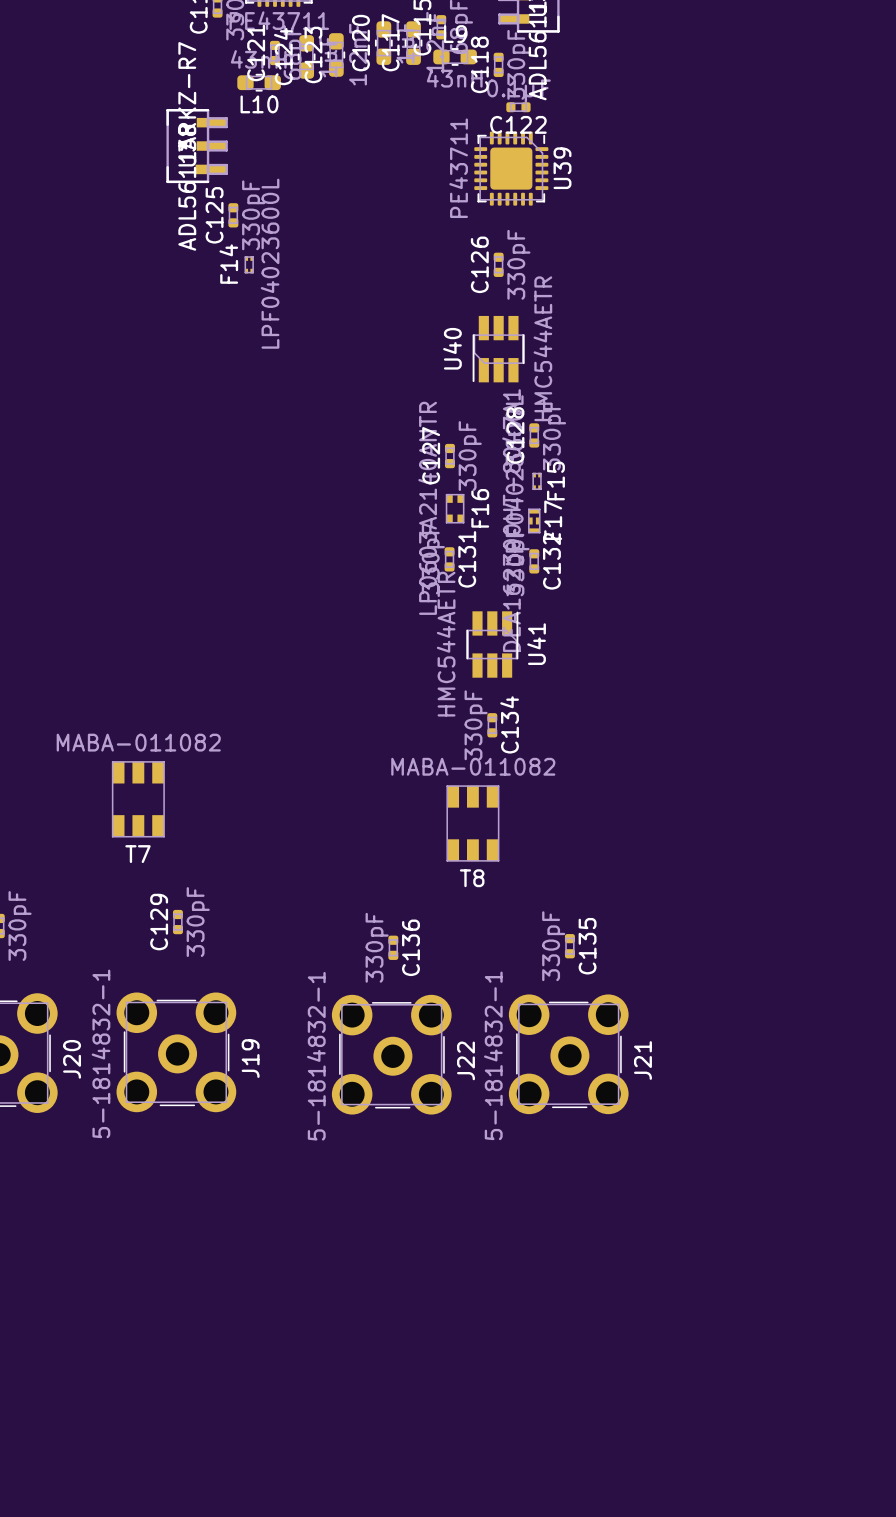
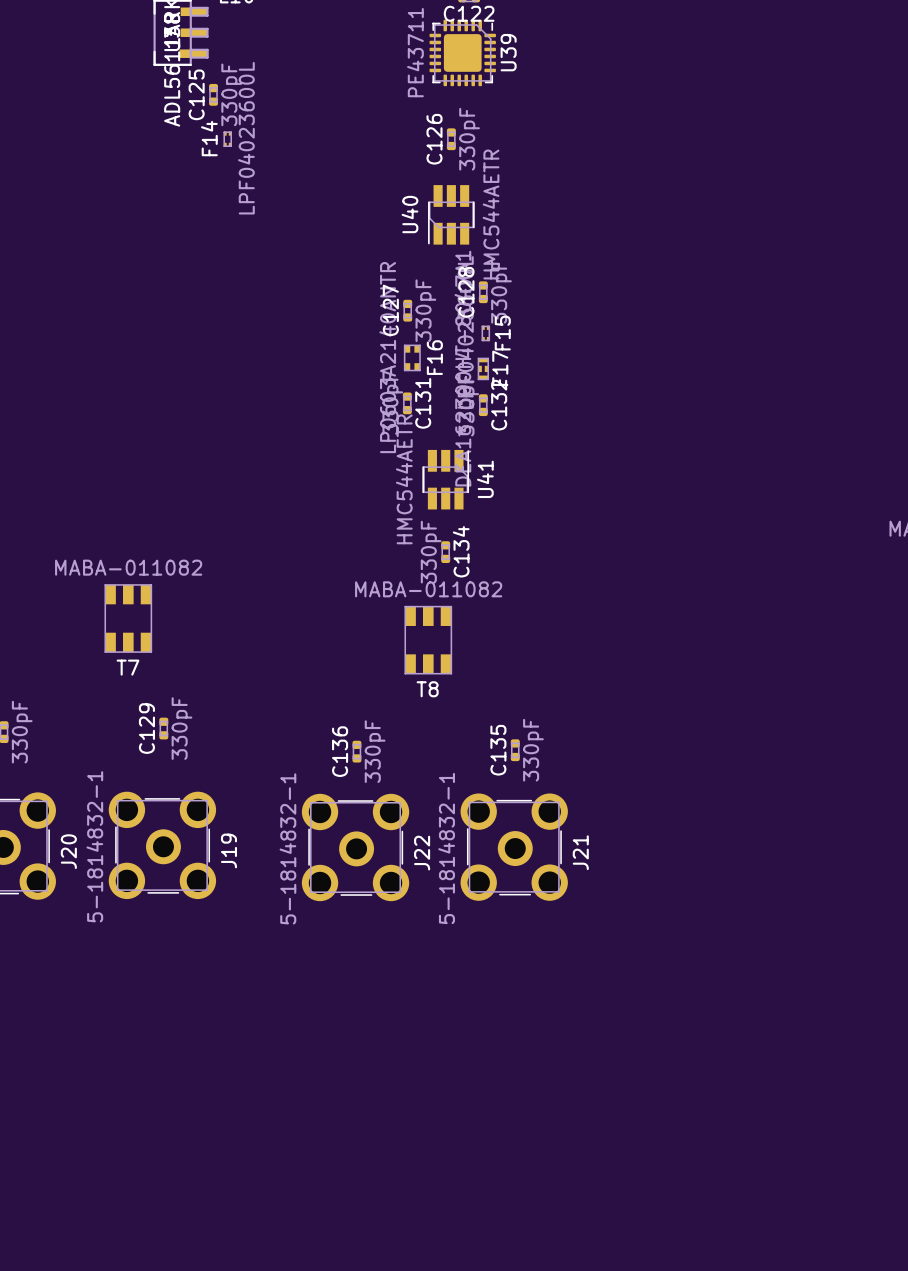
C135 value position: 330pF (553, 946) -> 330pF (533, 750)
C135 name position: C135 (587, 946) -> C135 (498, 750)
C136 value position: 330pF (377, 947) -> 330pF (375, 751)
C136 name position: C136 (410, 947) -> C136 (340, 751)

